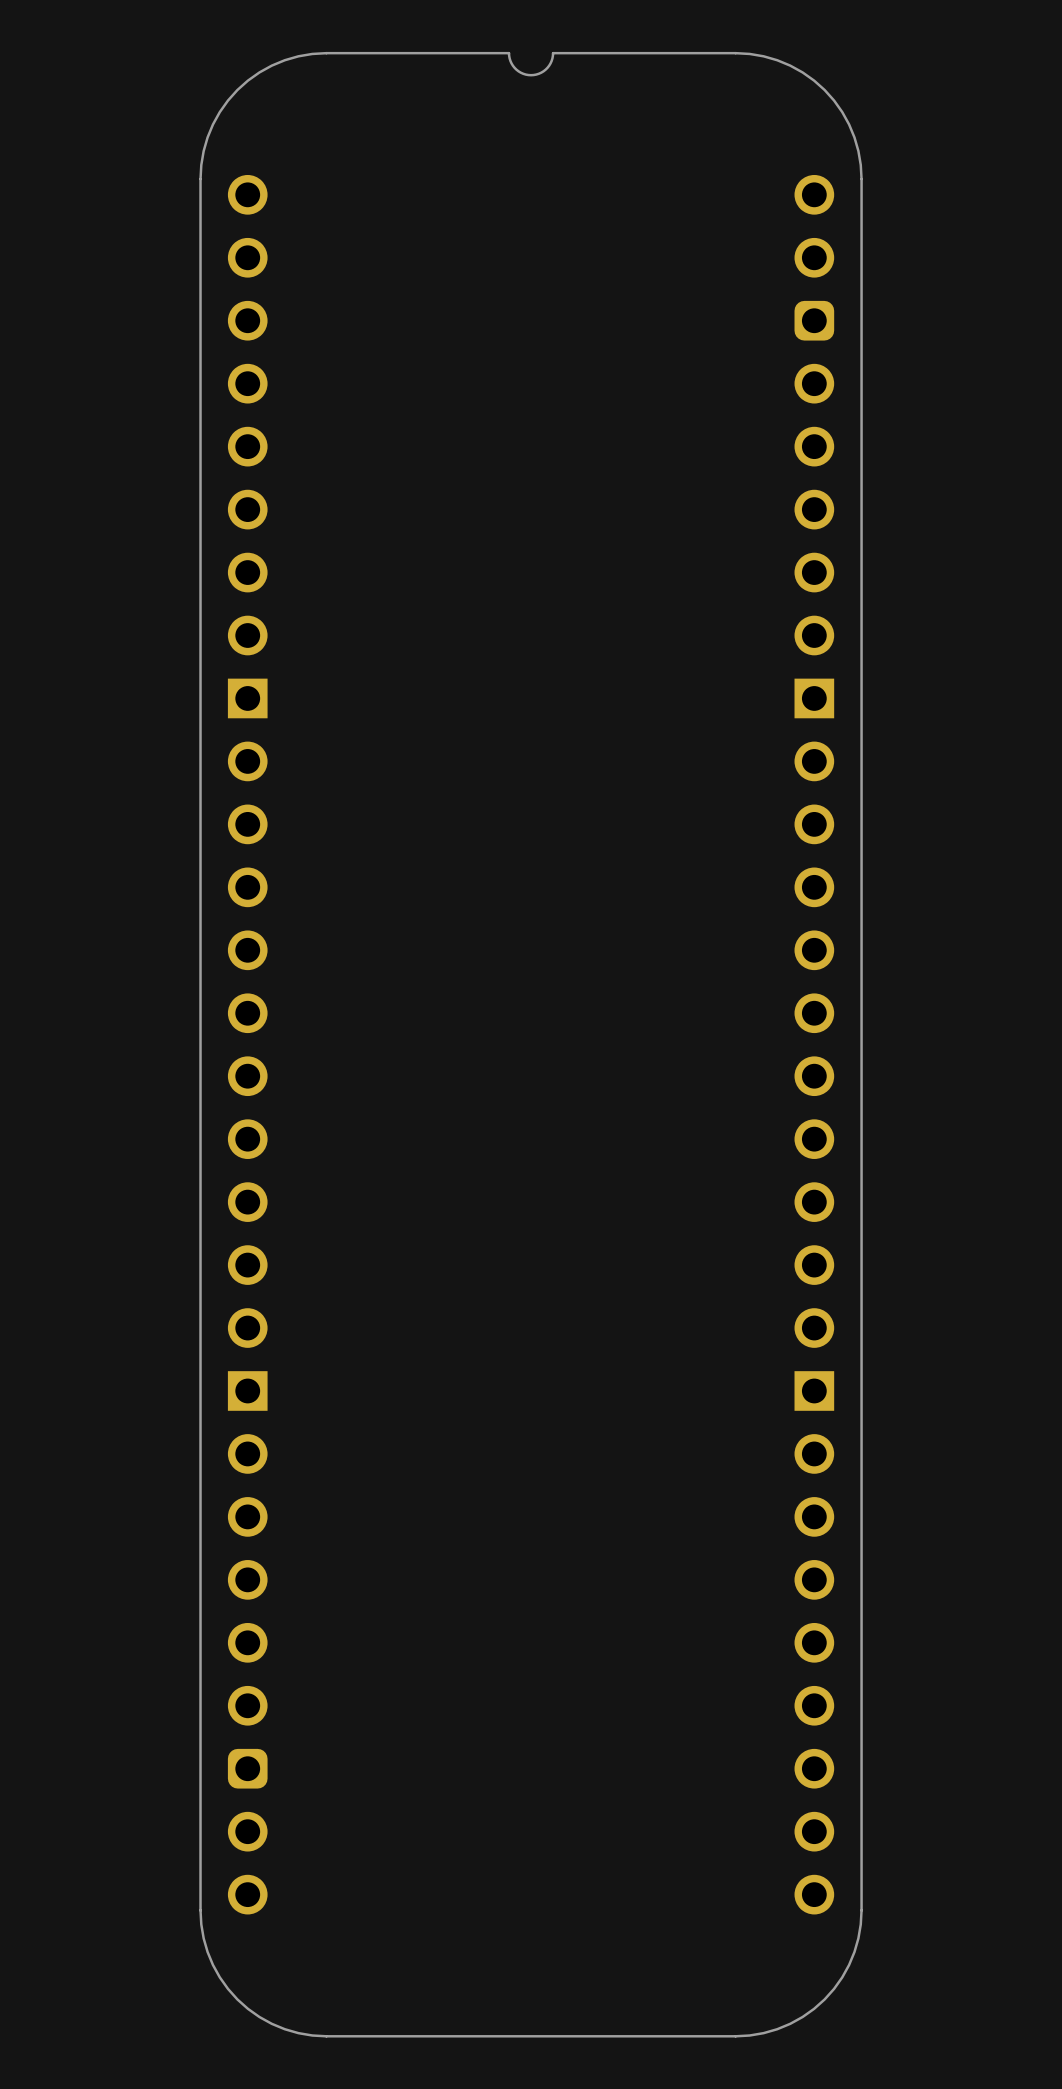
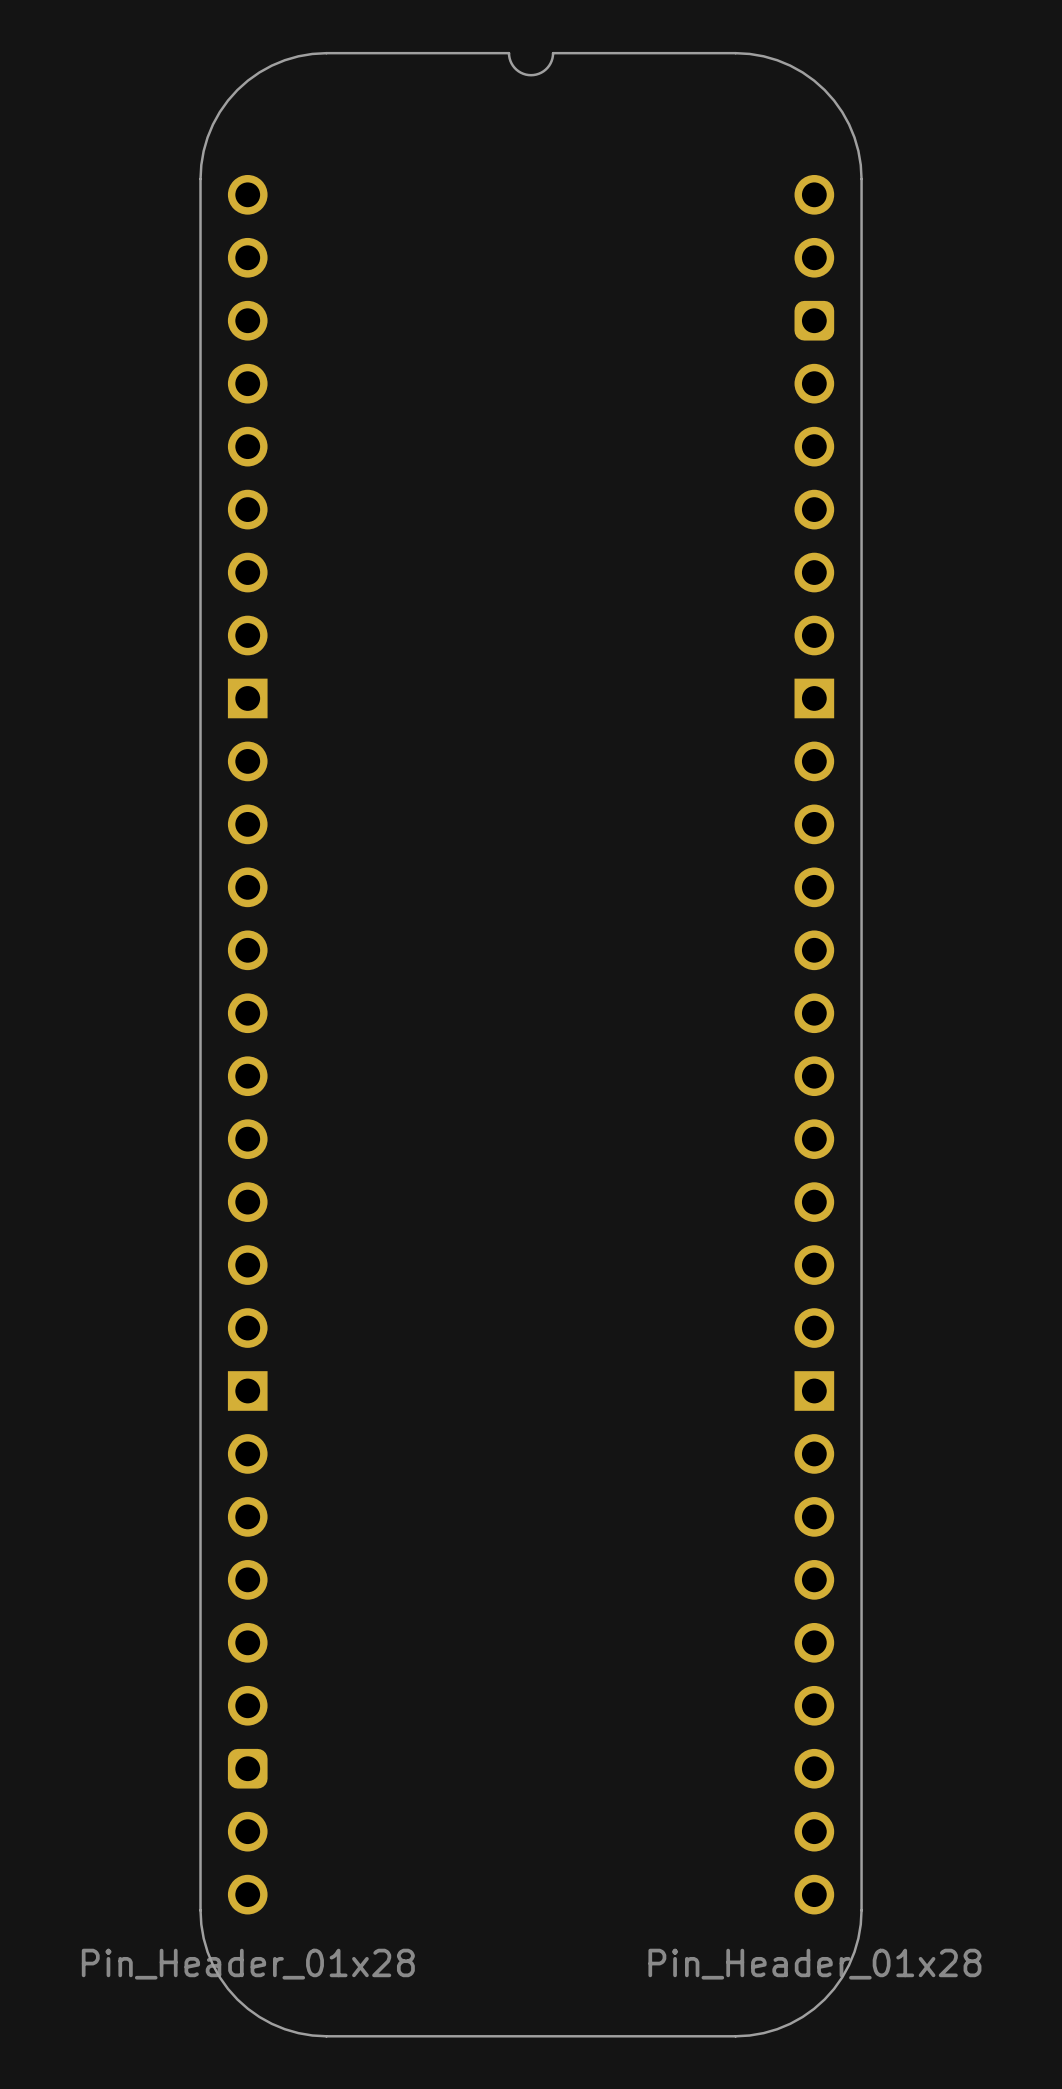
drawing: none -> [81, 1948, 415, 1980]
drawing: none -> [648, 1948, 982, 1980]

